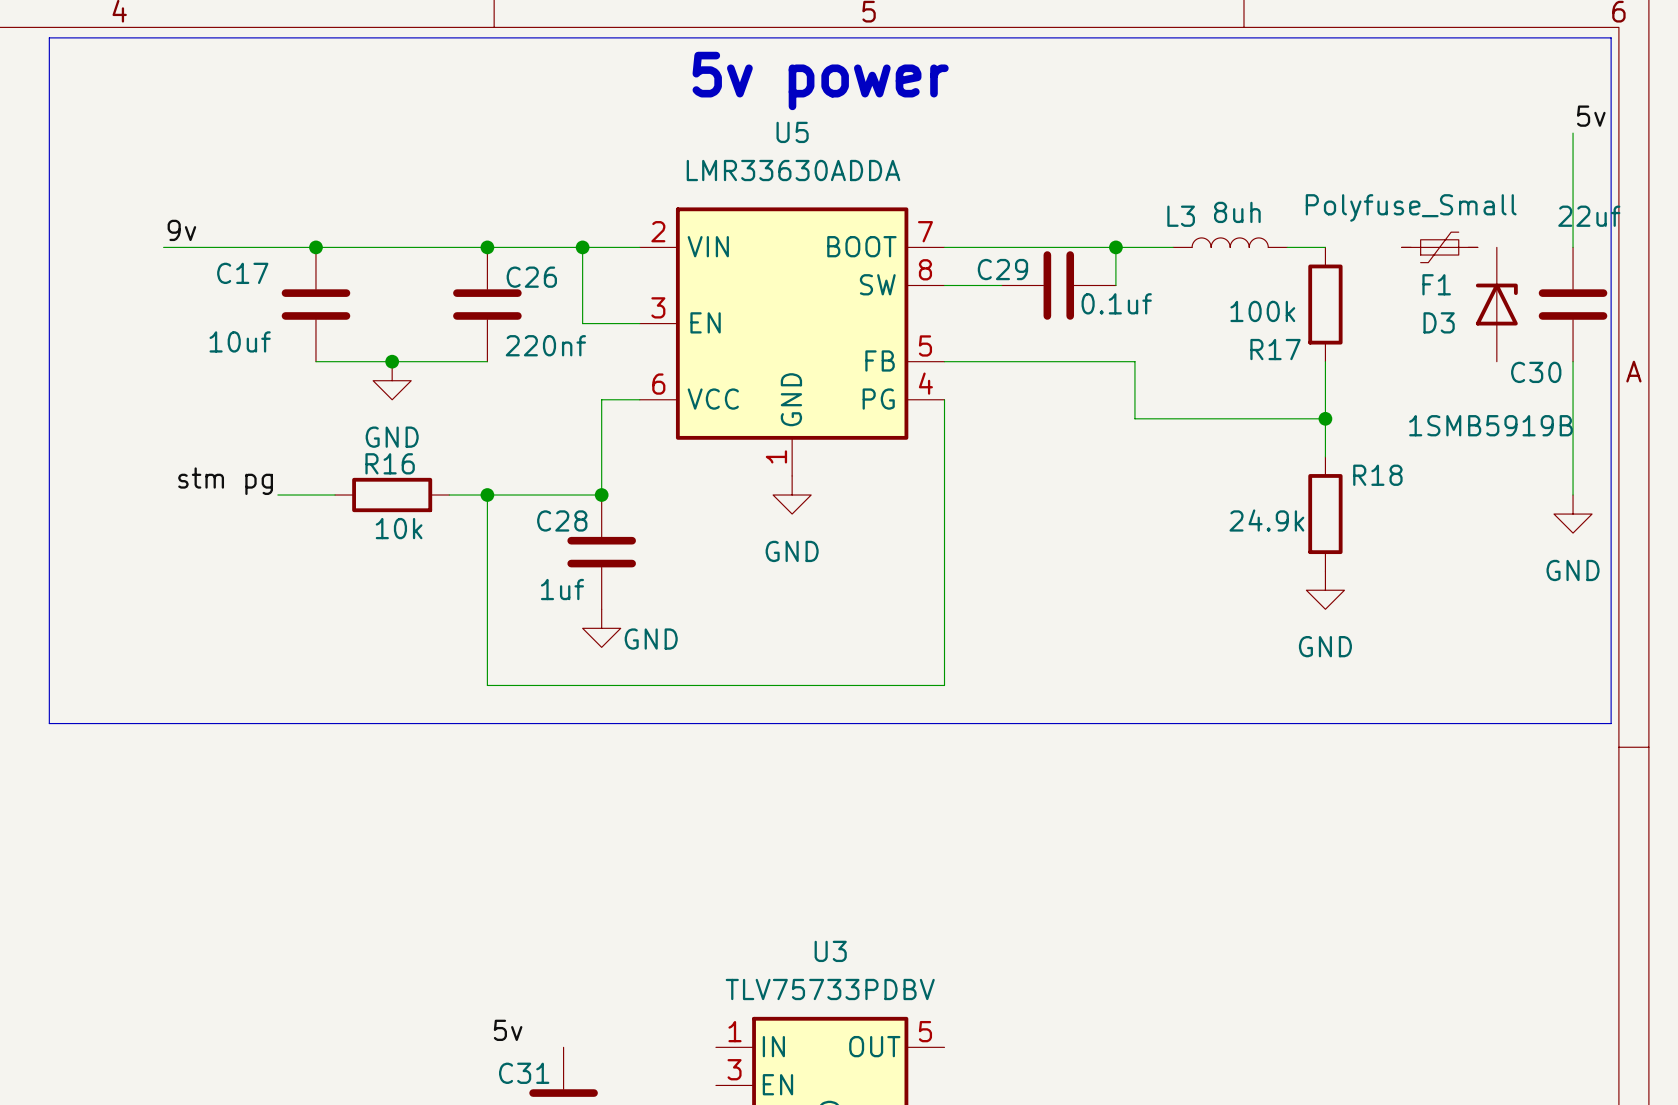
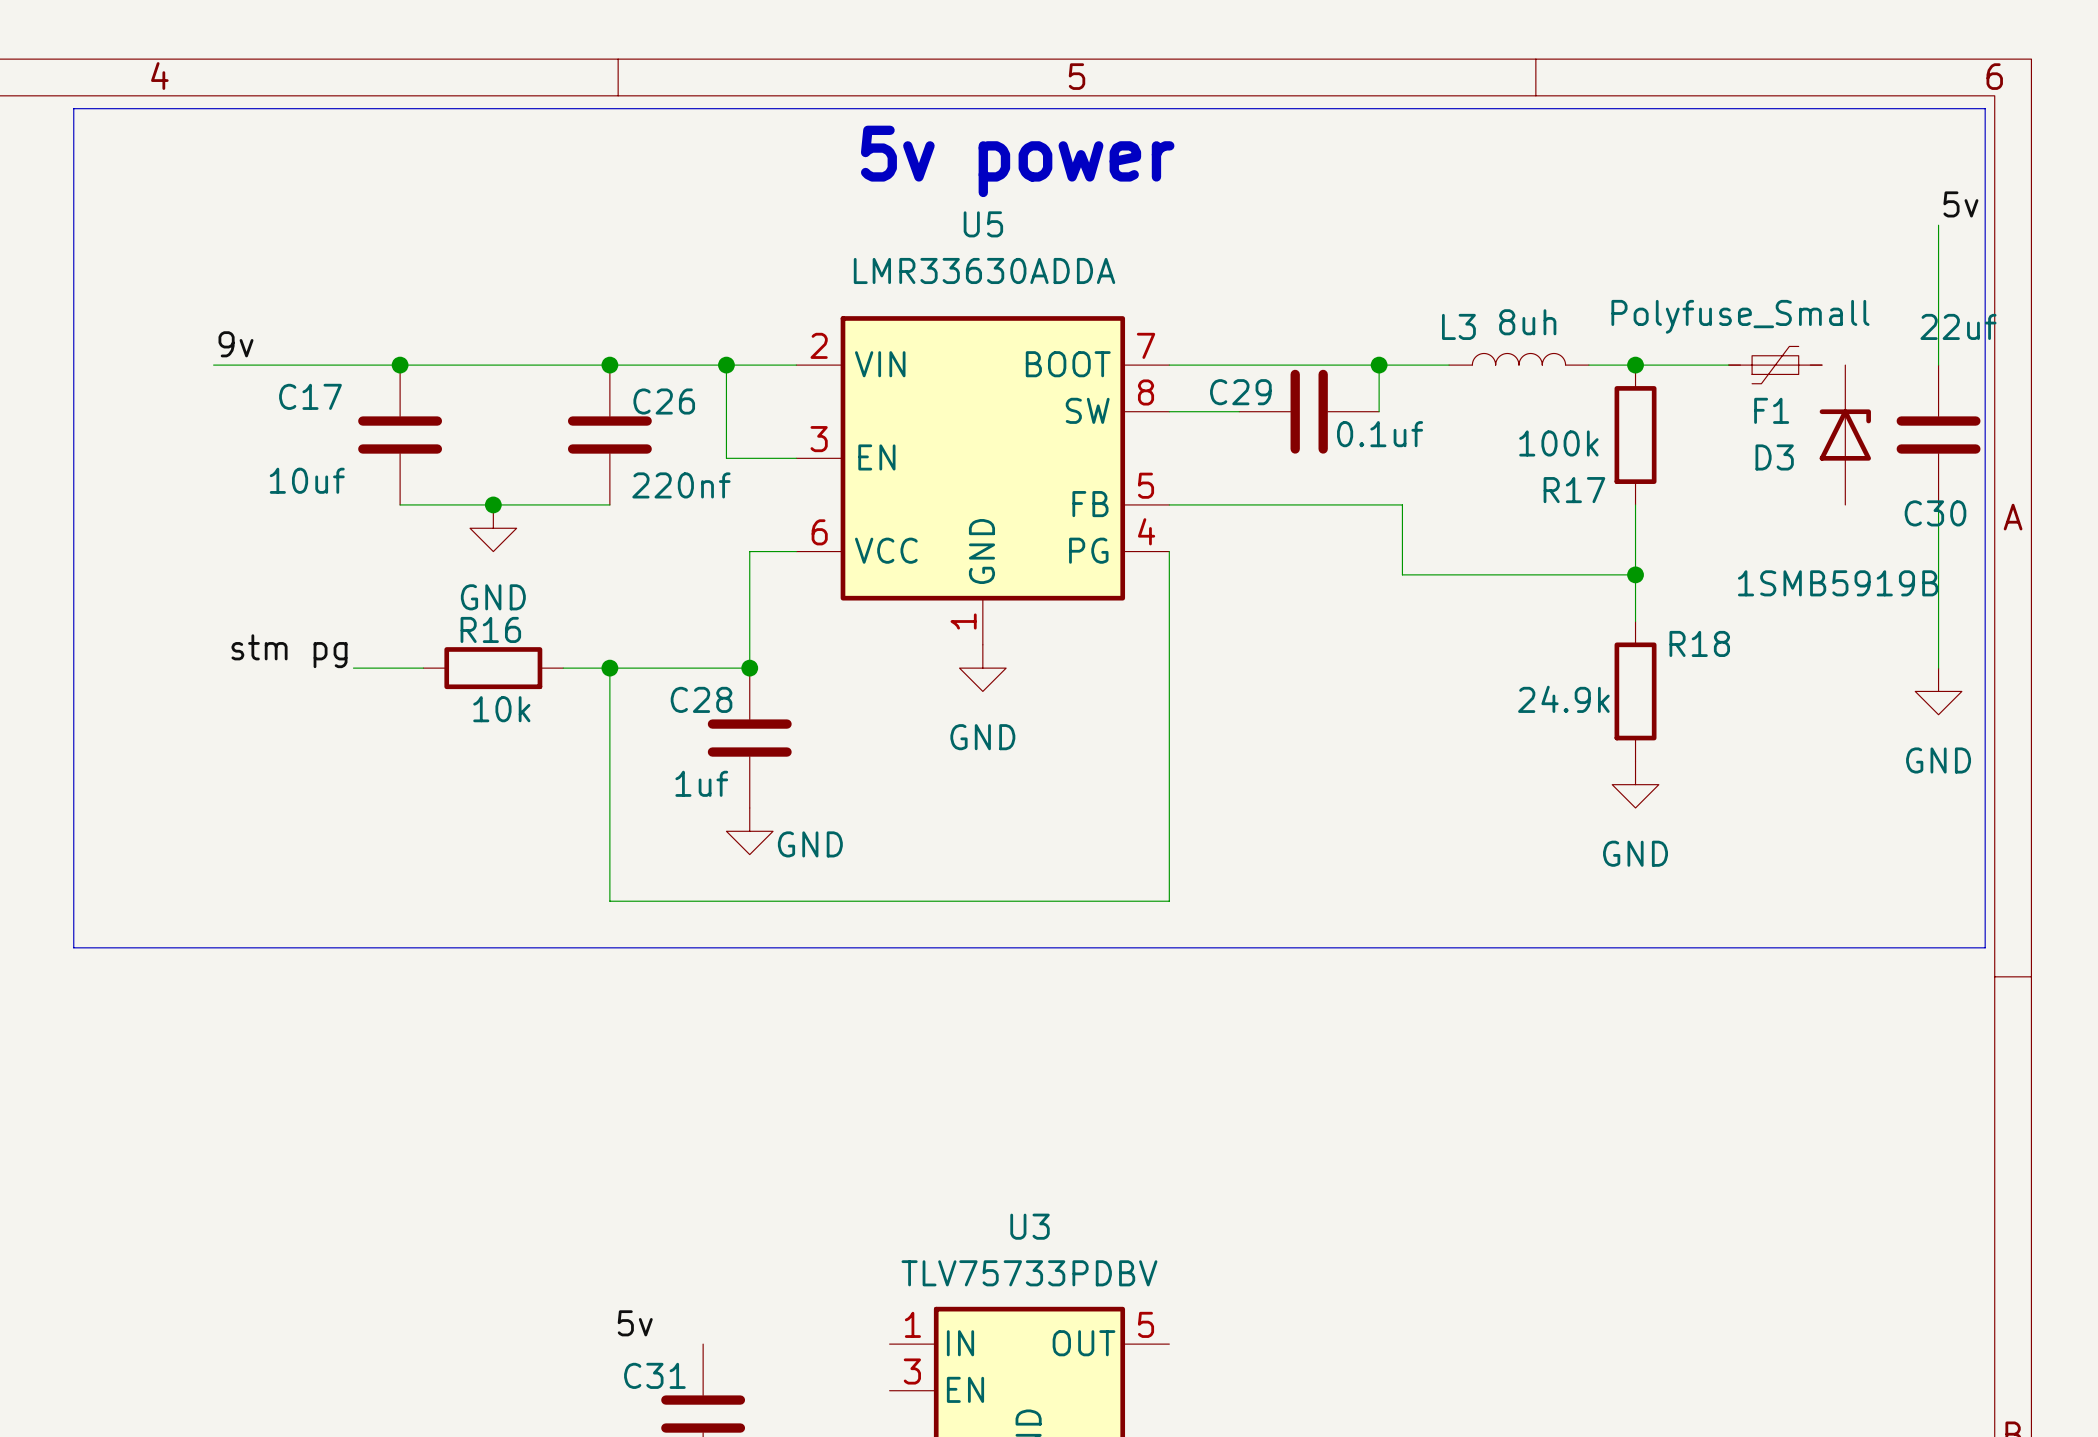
wire: none -> (1635, 365) (1728, 365)
junction: none -> (1635, 365)
C30 name position: C30 (1536, 372) -> C30 (1935, 513)

